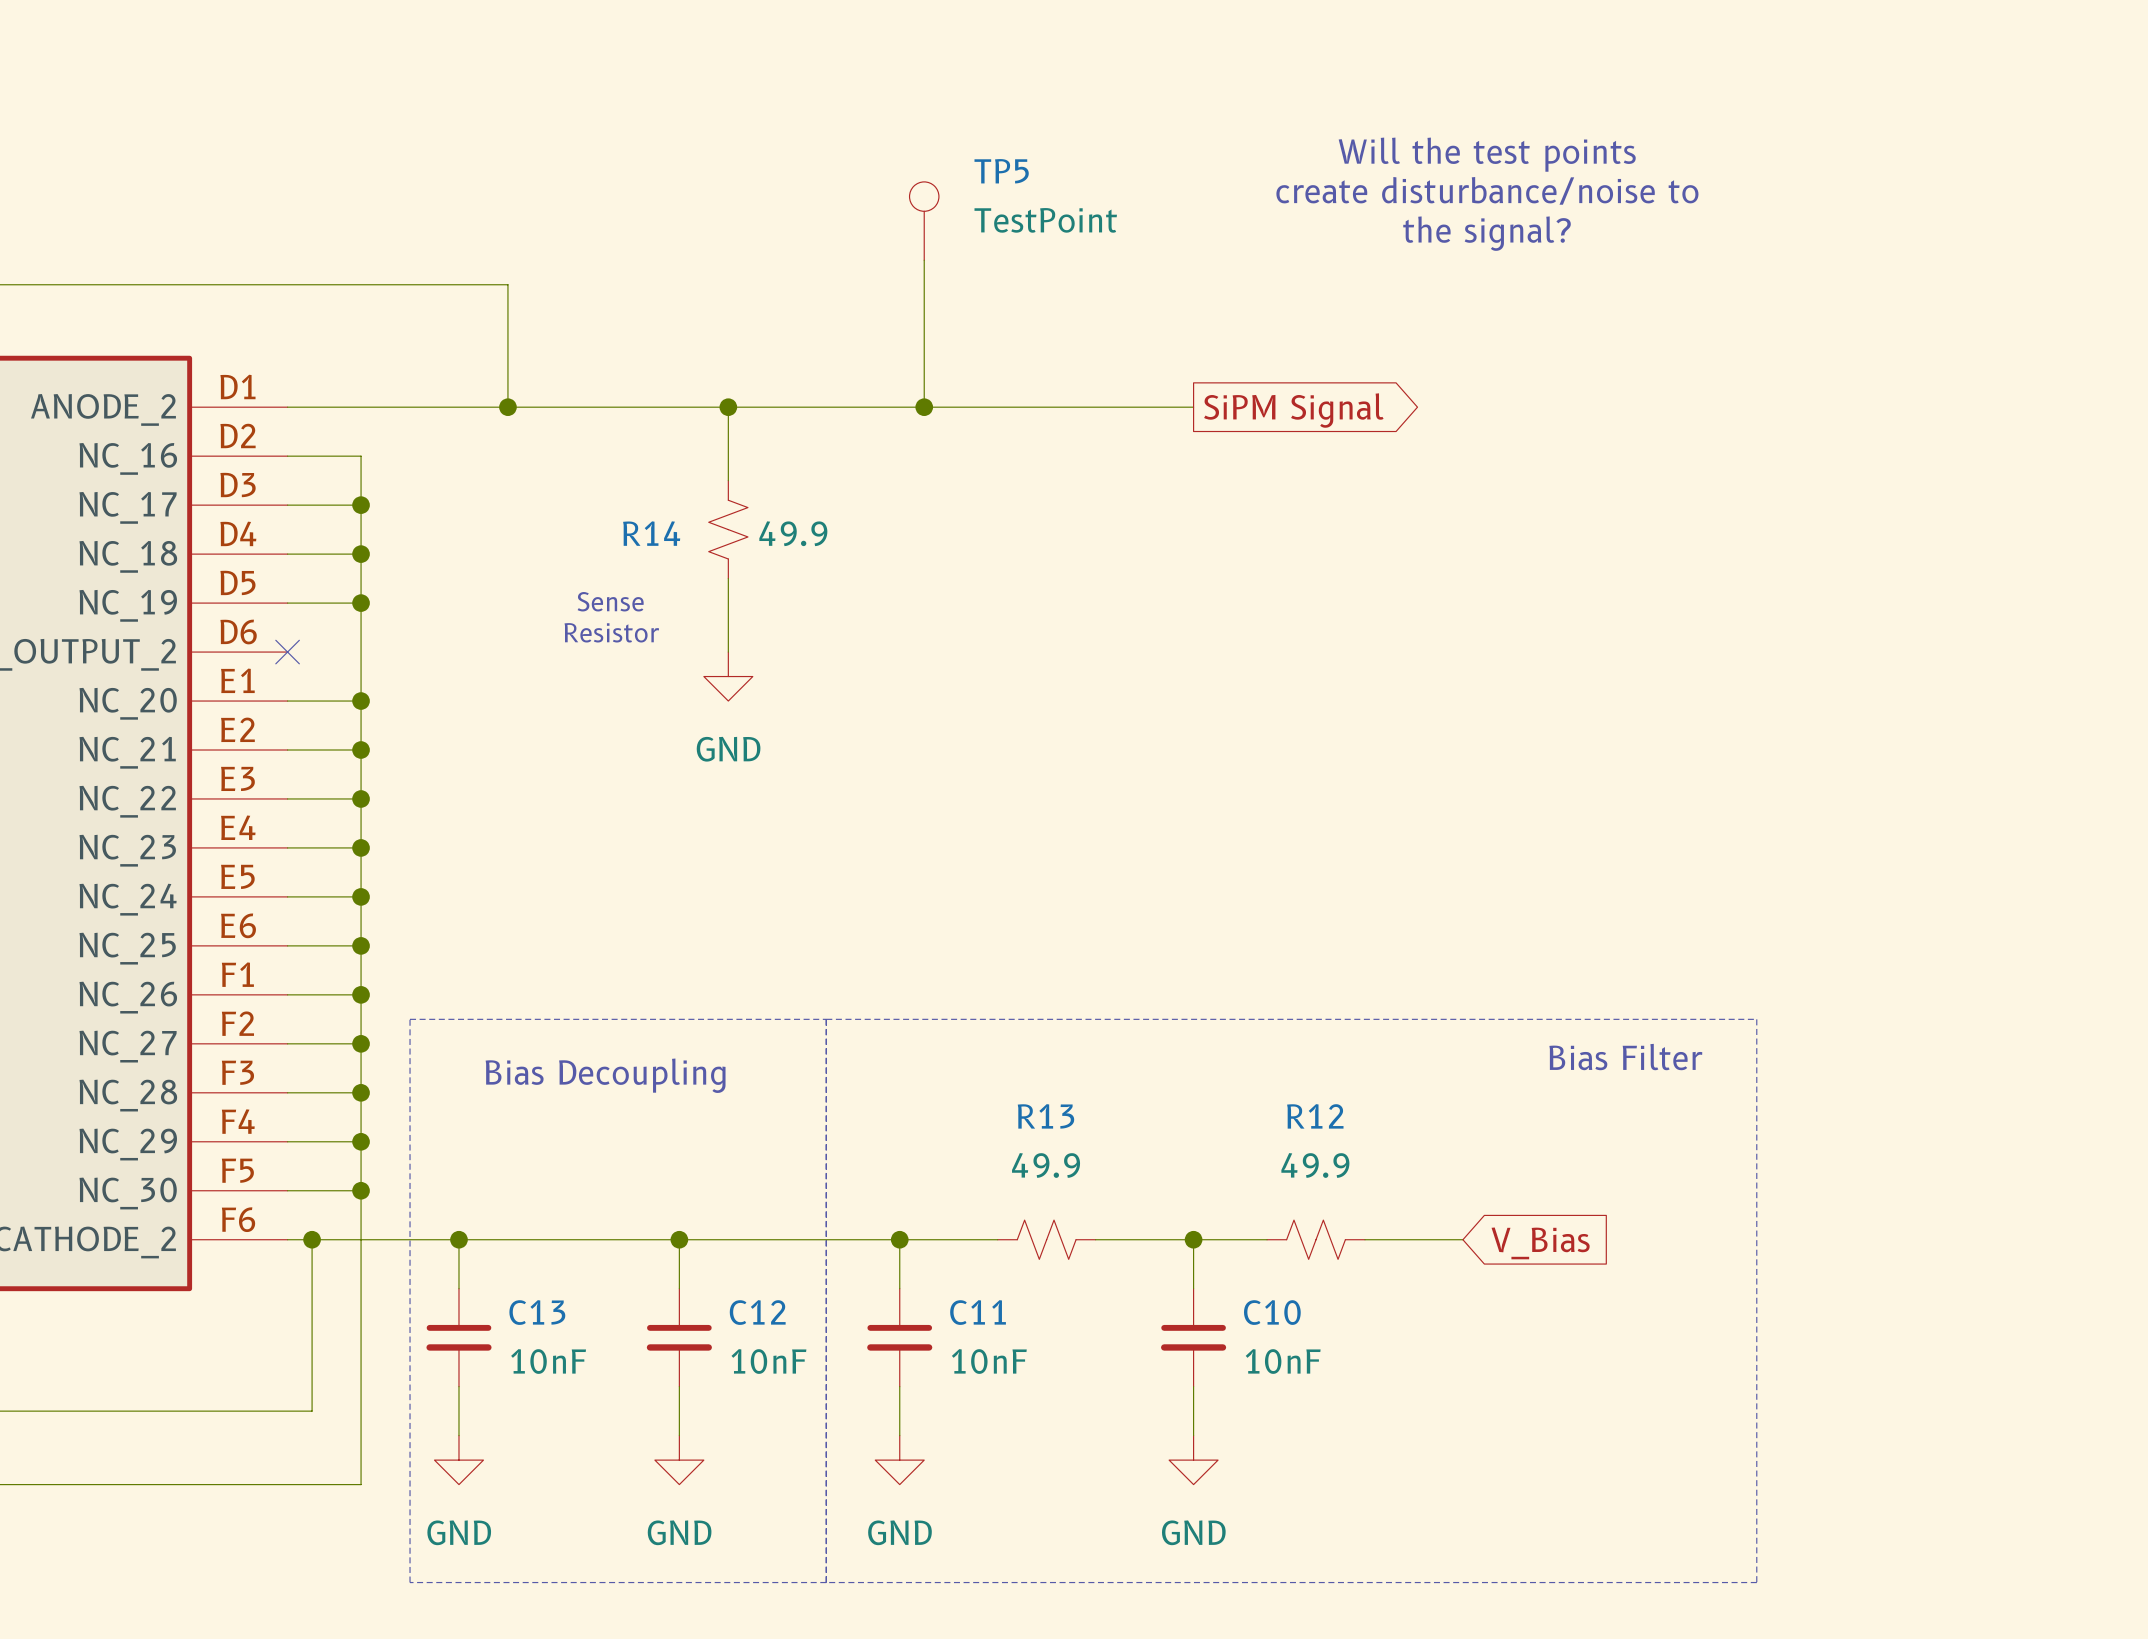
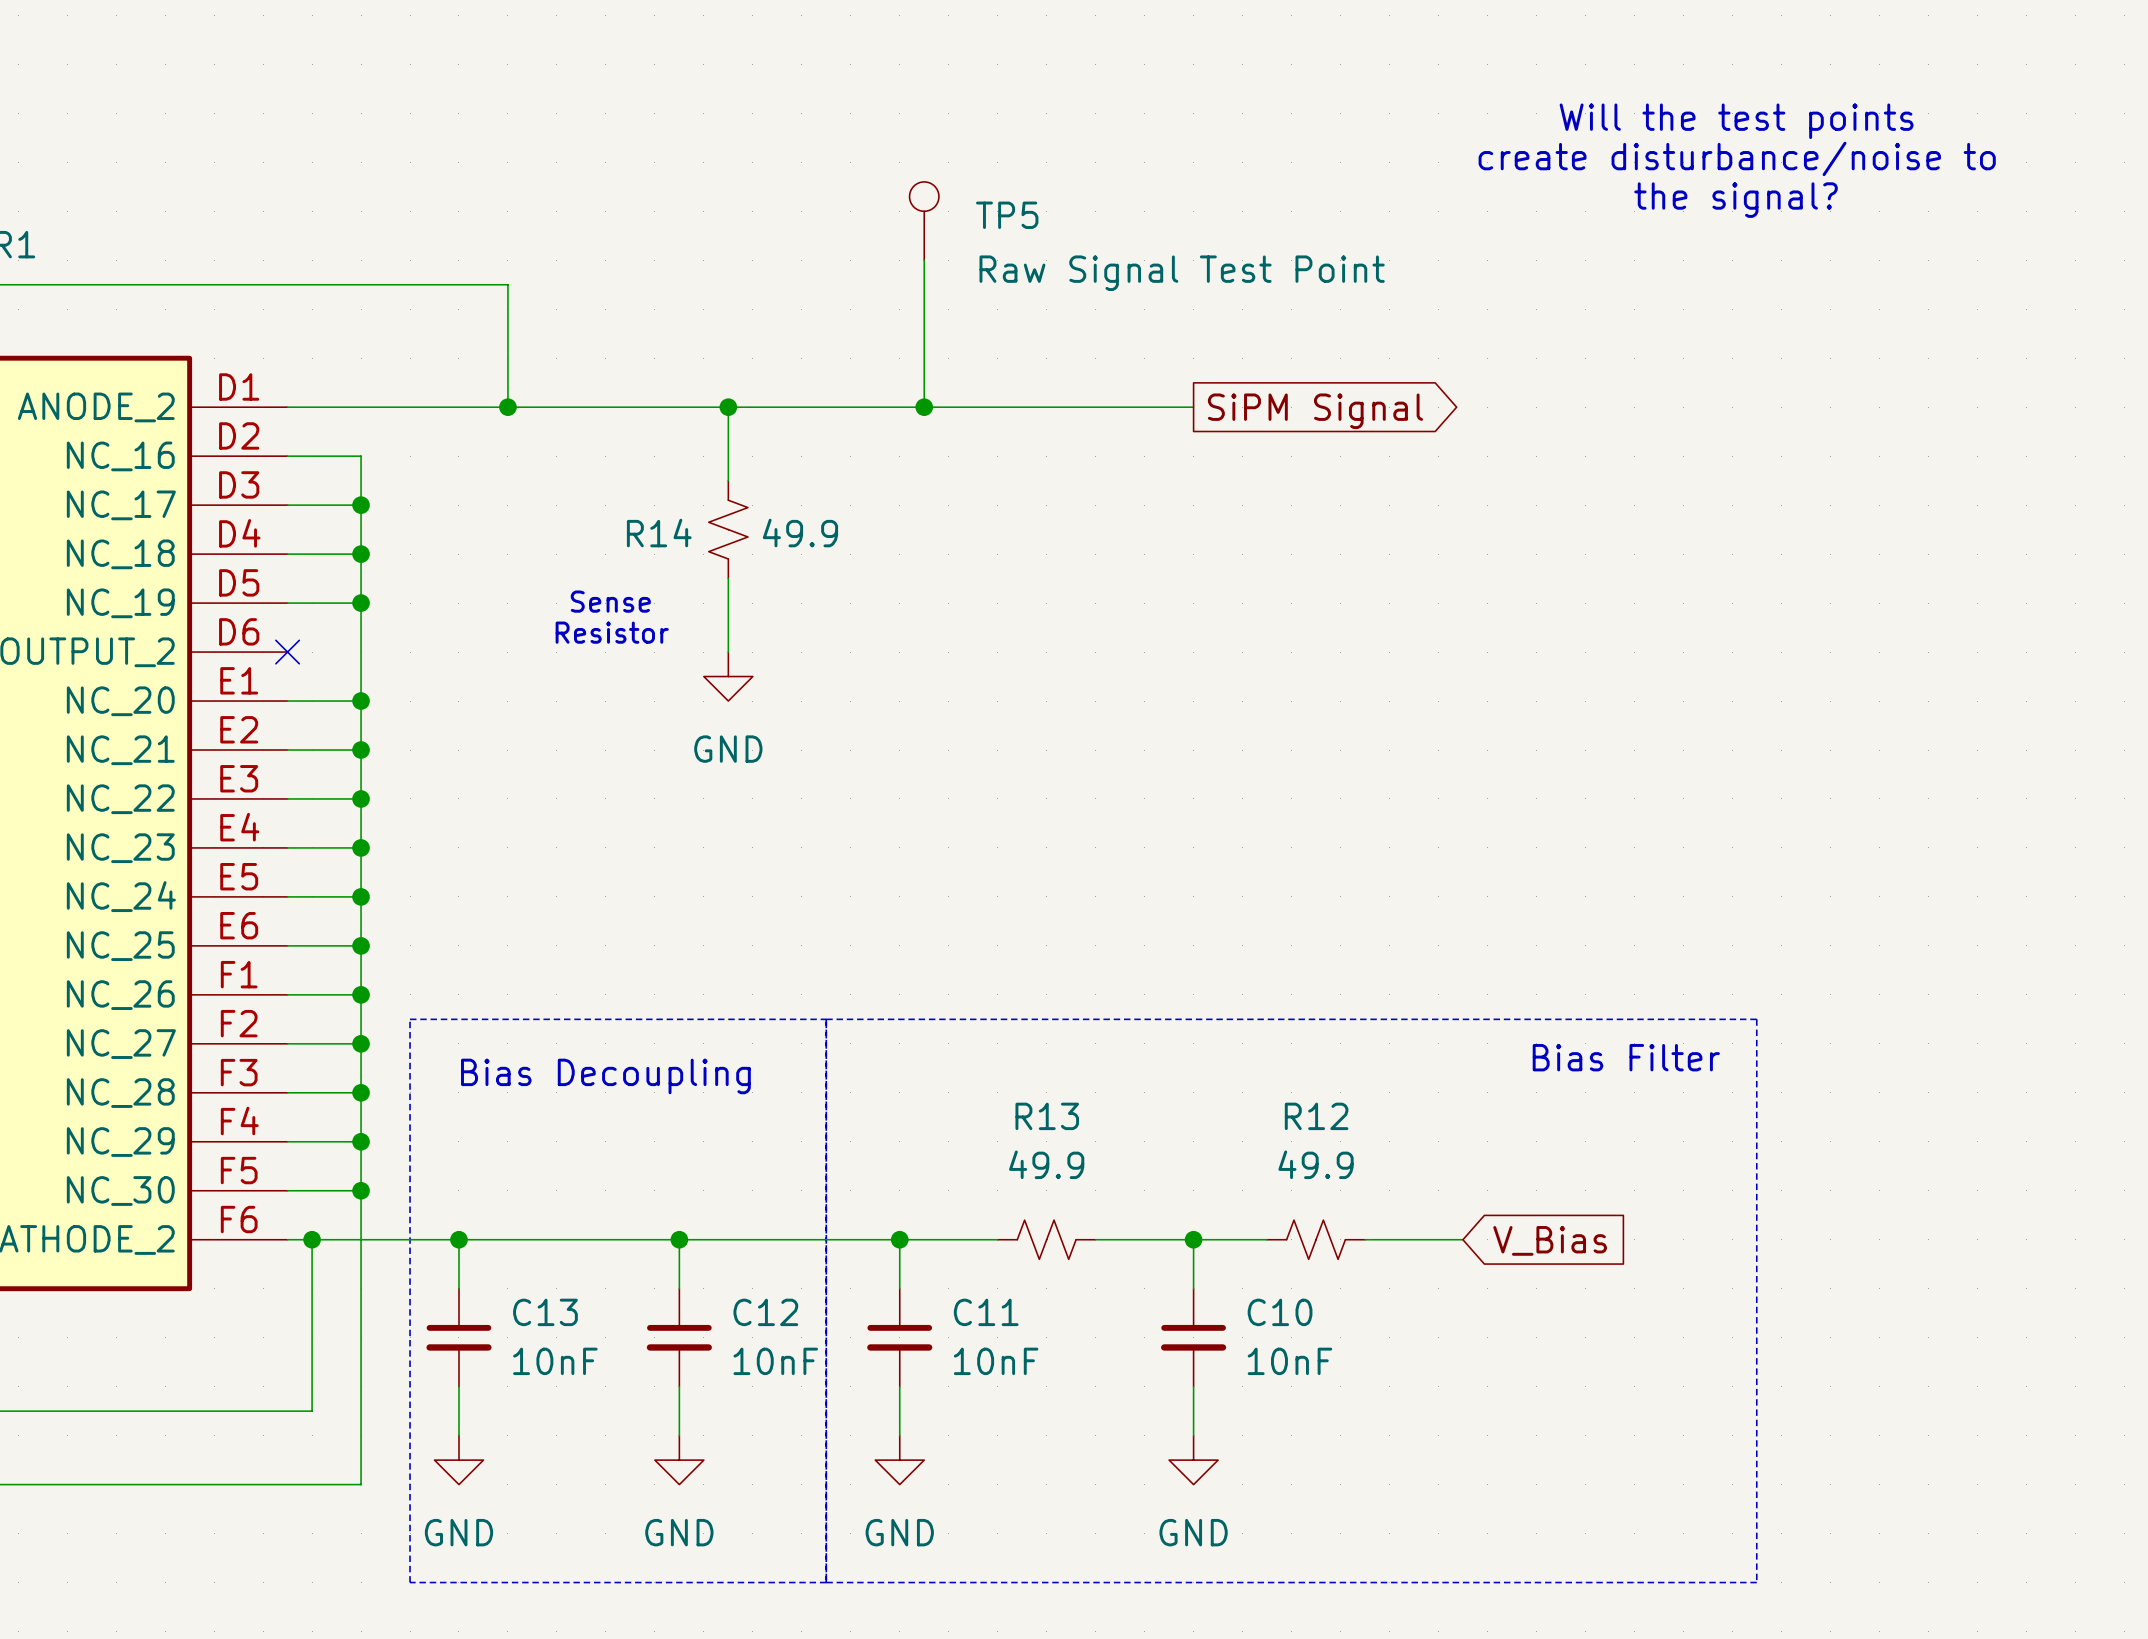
text position: Will the test points (1487, 154) -> Will the test points (1736, 121)
TP5 name position: TP5 (1001, 171) -> TP5 (1007, 215)
text position: create disturbance/noise to (1487, 190) -> create disturbance/noise to (1737, 158)
TP5 value: TestPoint (1045, 220) -> Raw Signal Test Point (1182, 273)
text position: the signal? (1487, 233) -> the signal? (1736, 200)

